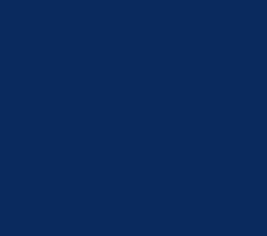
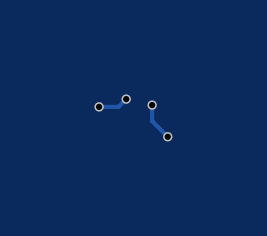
track: none -> (126, 99) (118, 106) (99, 106)
via: none -> (126, 99)
track: none -> (152, 105) (152, 121) (167, 136)
via: none -> (152, 105)
via: none -> (99, 106)
via: none -> (167, 136)

